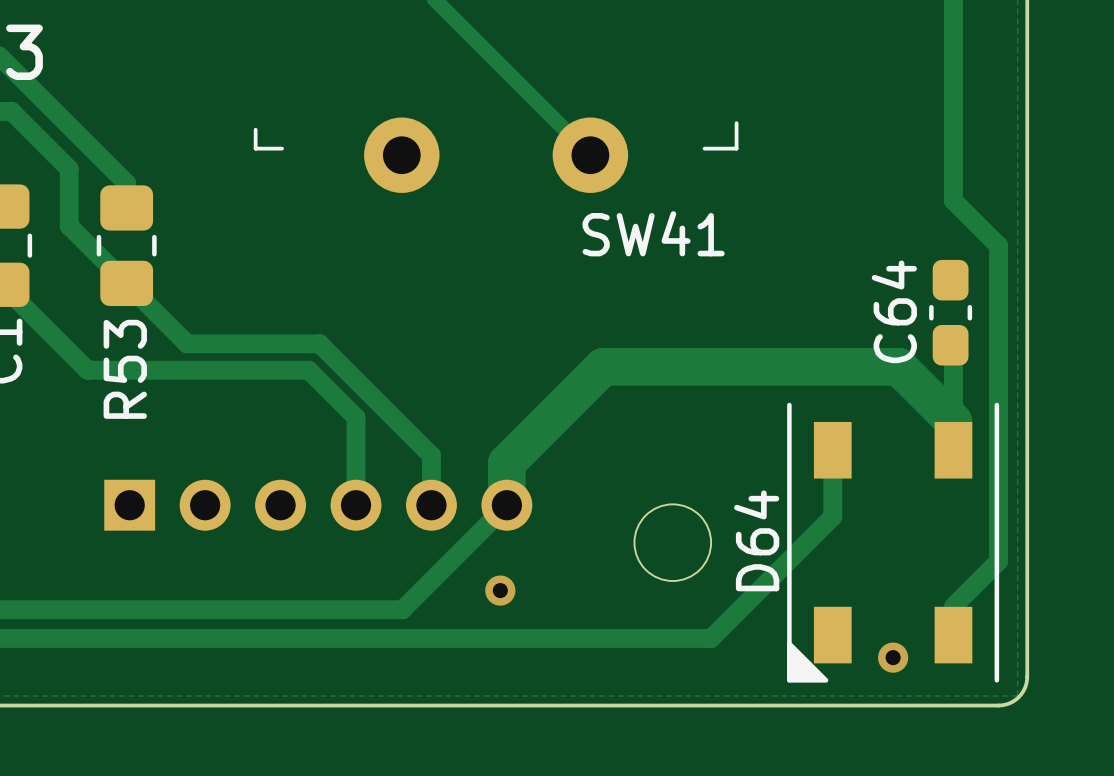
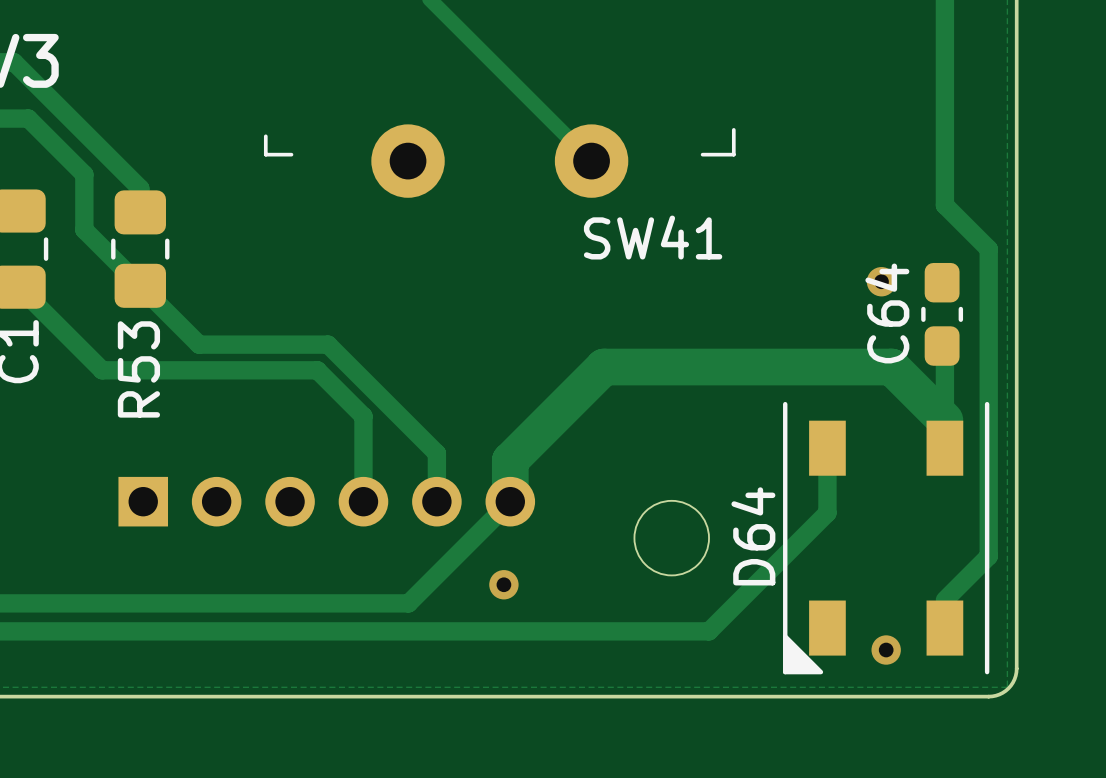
via: none -> (881, 281)

